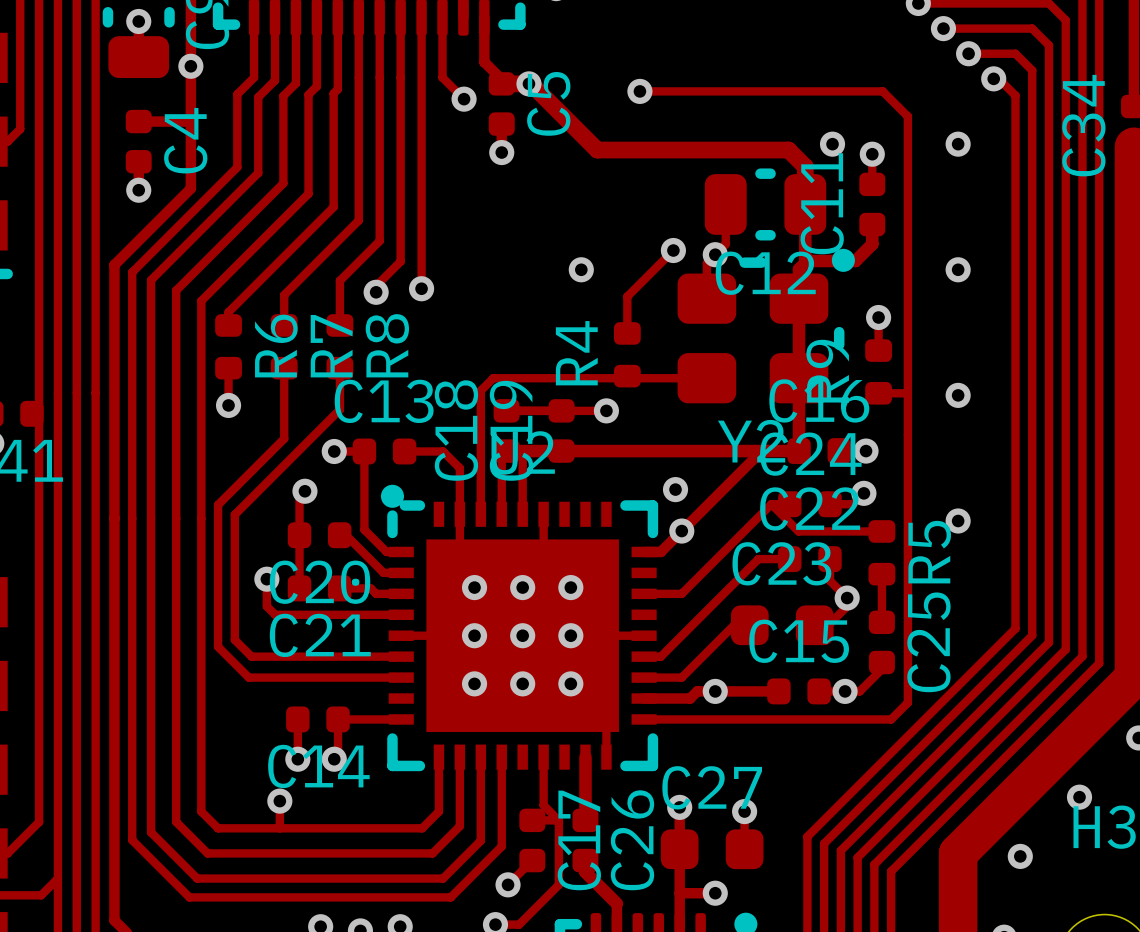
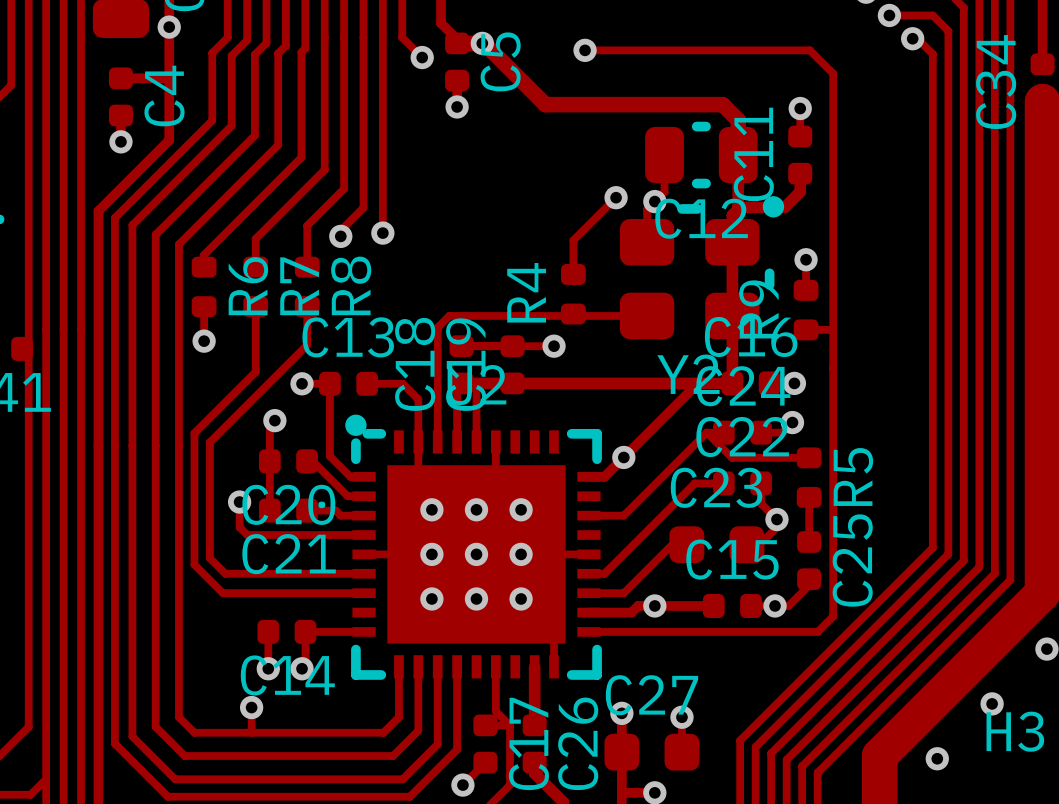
via: (832, 144) -> none
via: (958, 144) -> none
via: (581, 269) -> none
via: (958, 269) -> none
via: (958, 395) -> none
via: (675, 489) -> none
via: (958, 520) -> none

